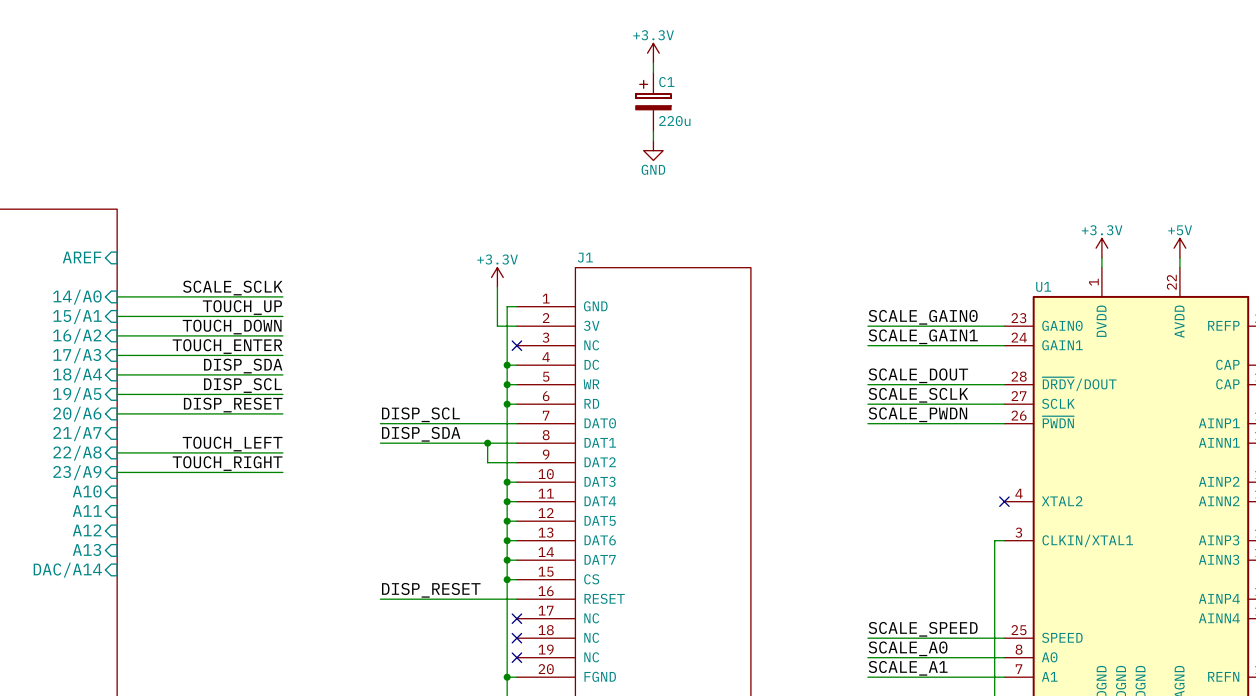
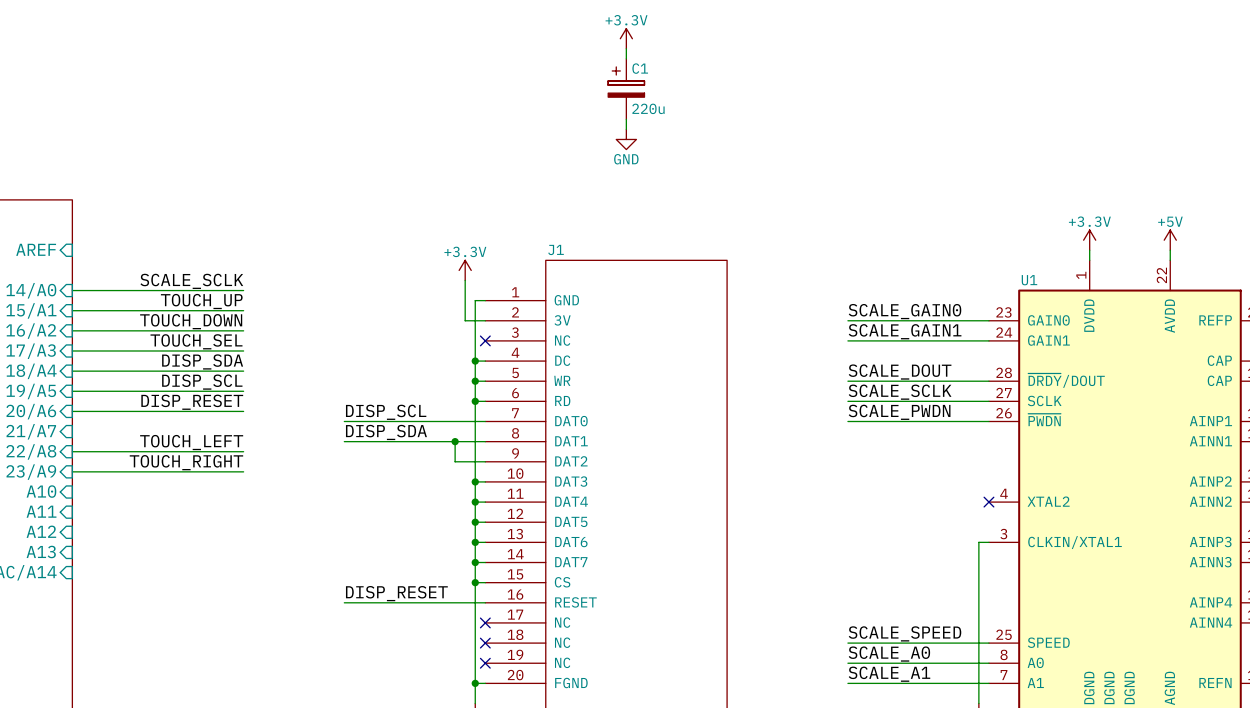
label: TOUCH_ENTER (227, 346) -> TOUCH_SEL (196, 341)

